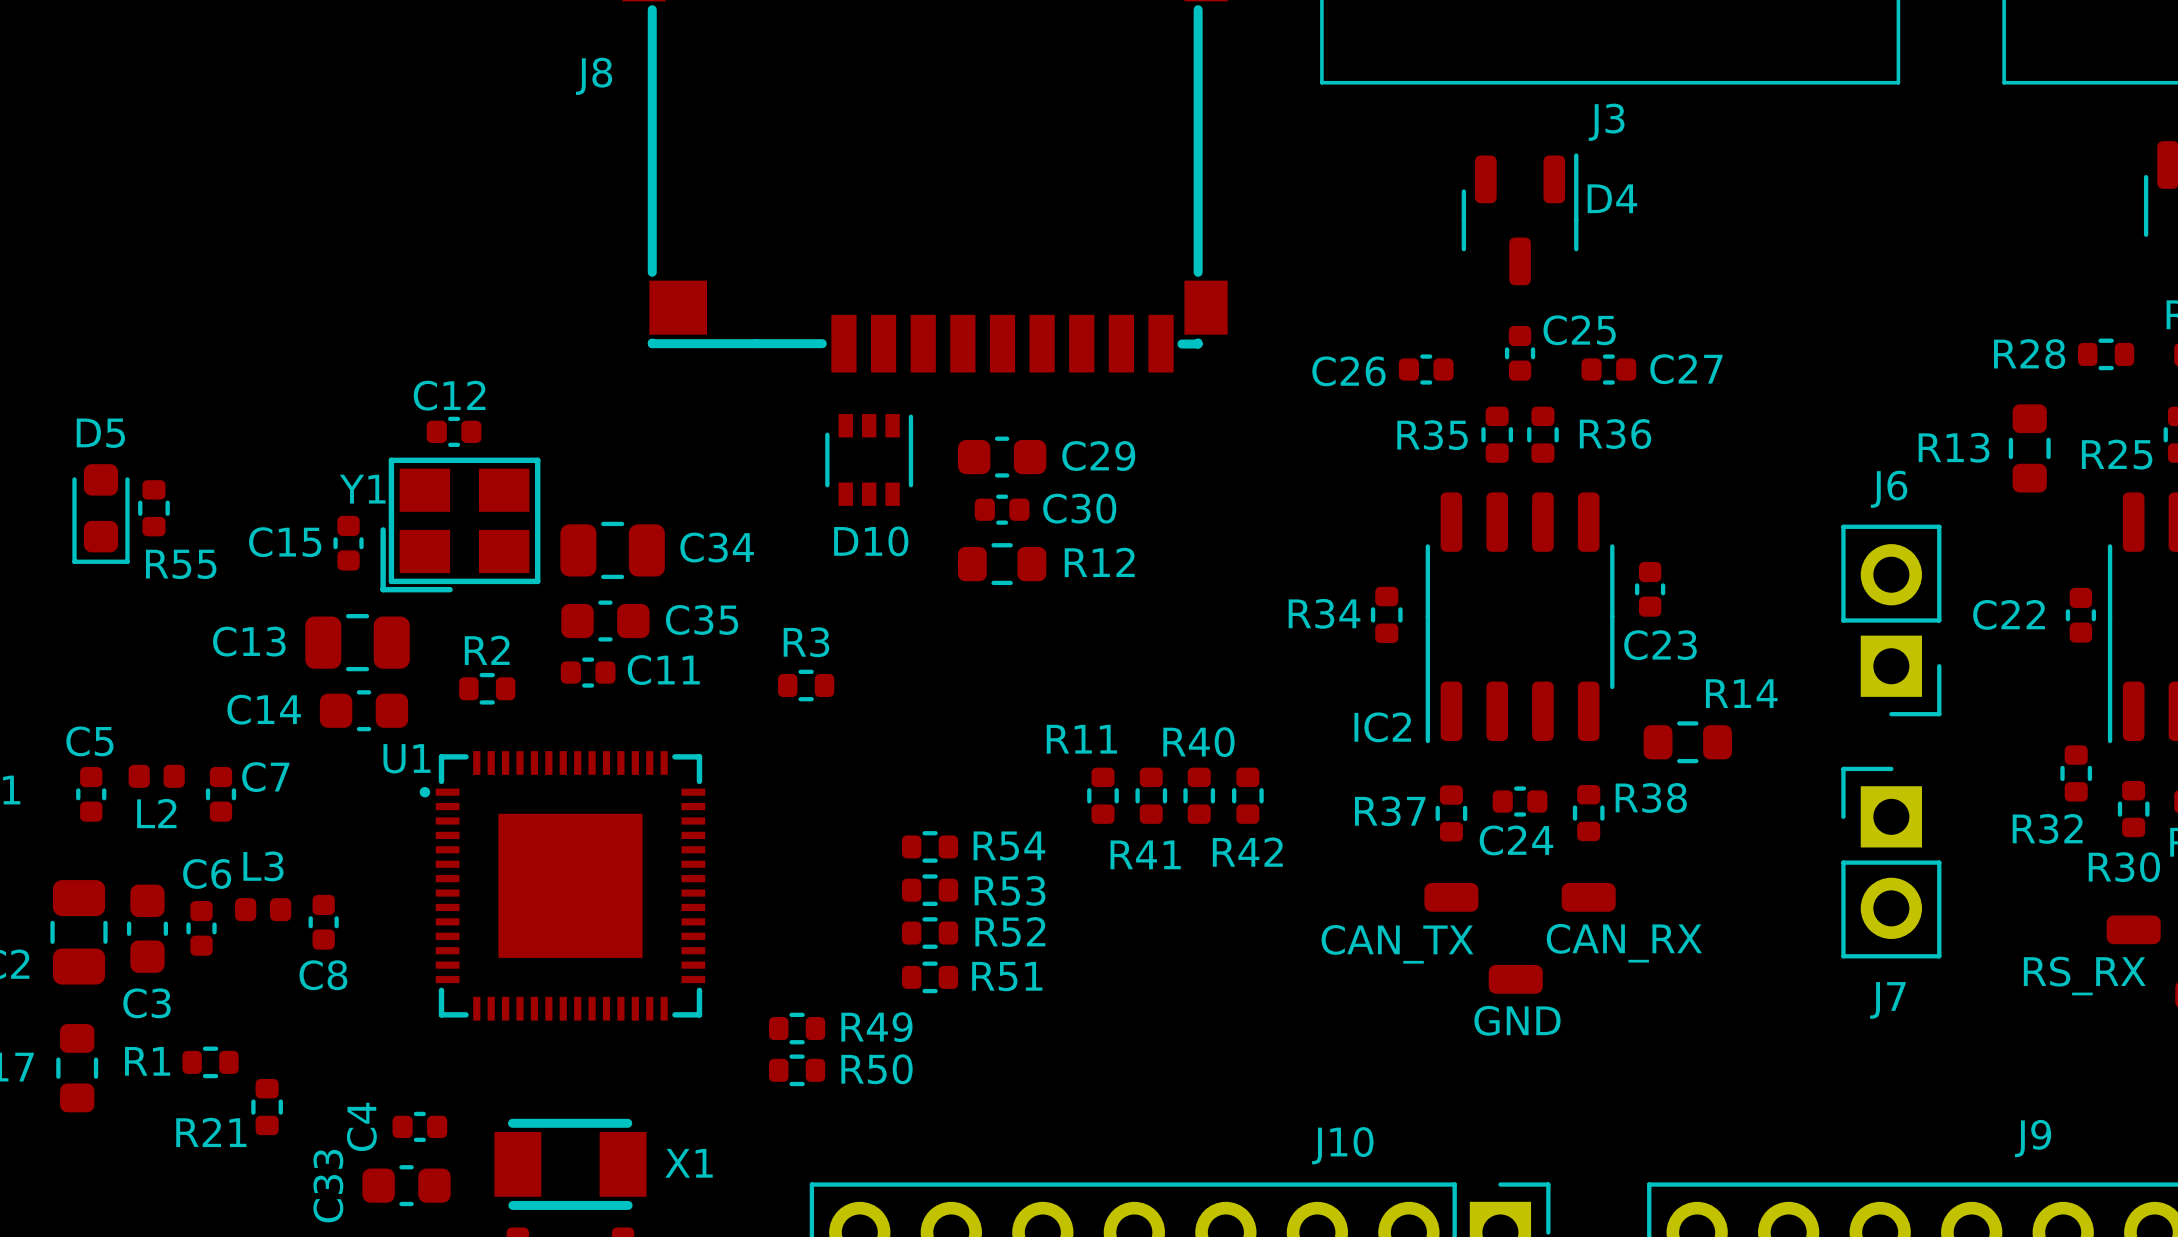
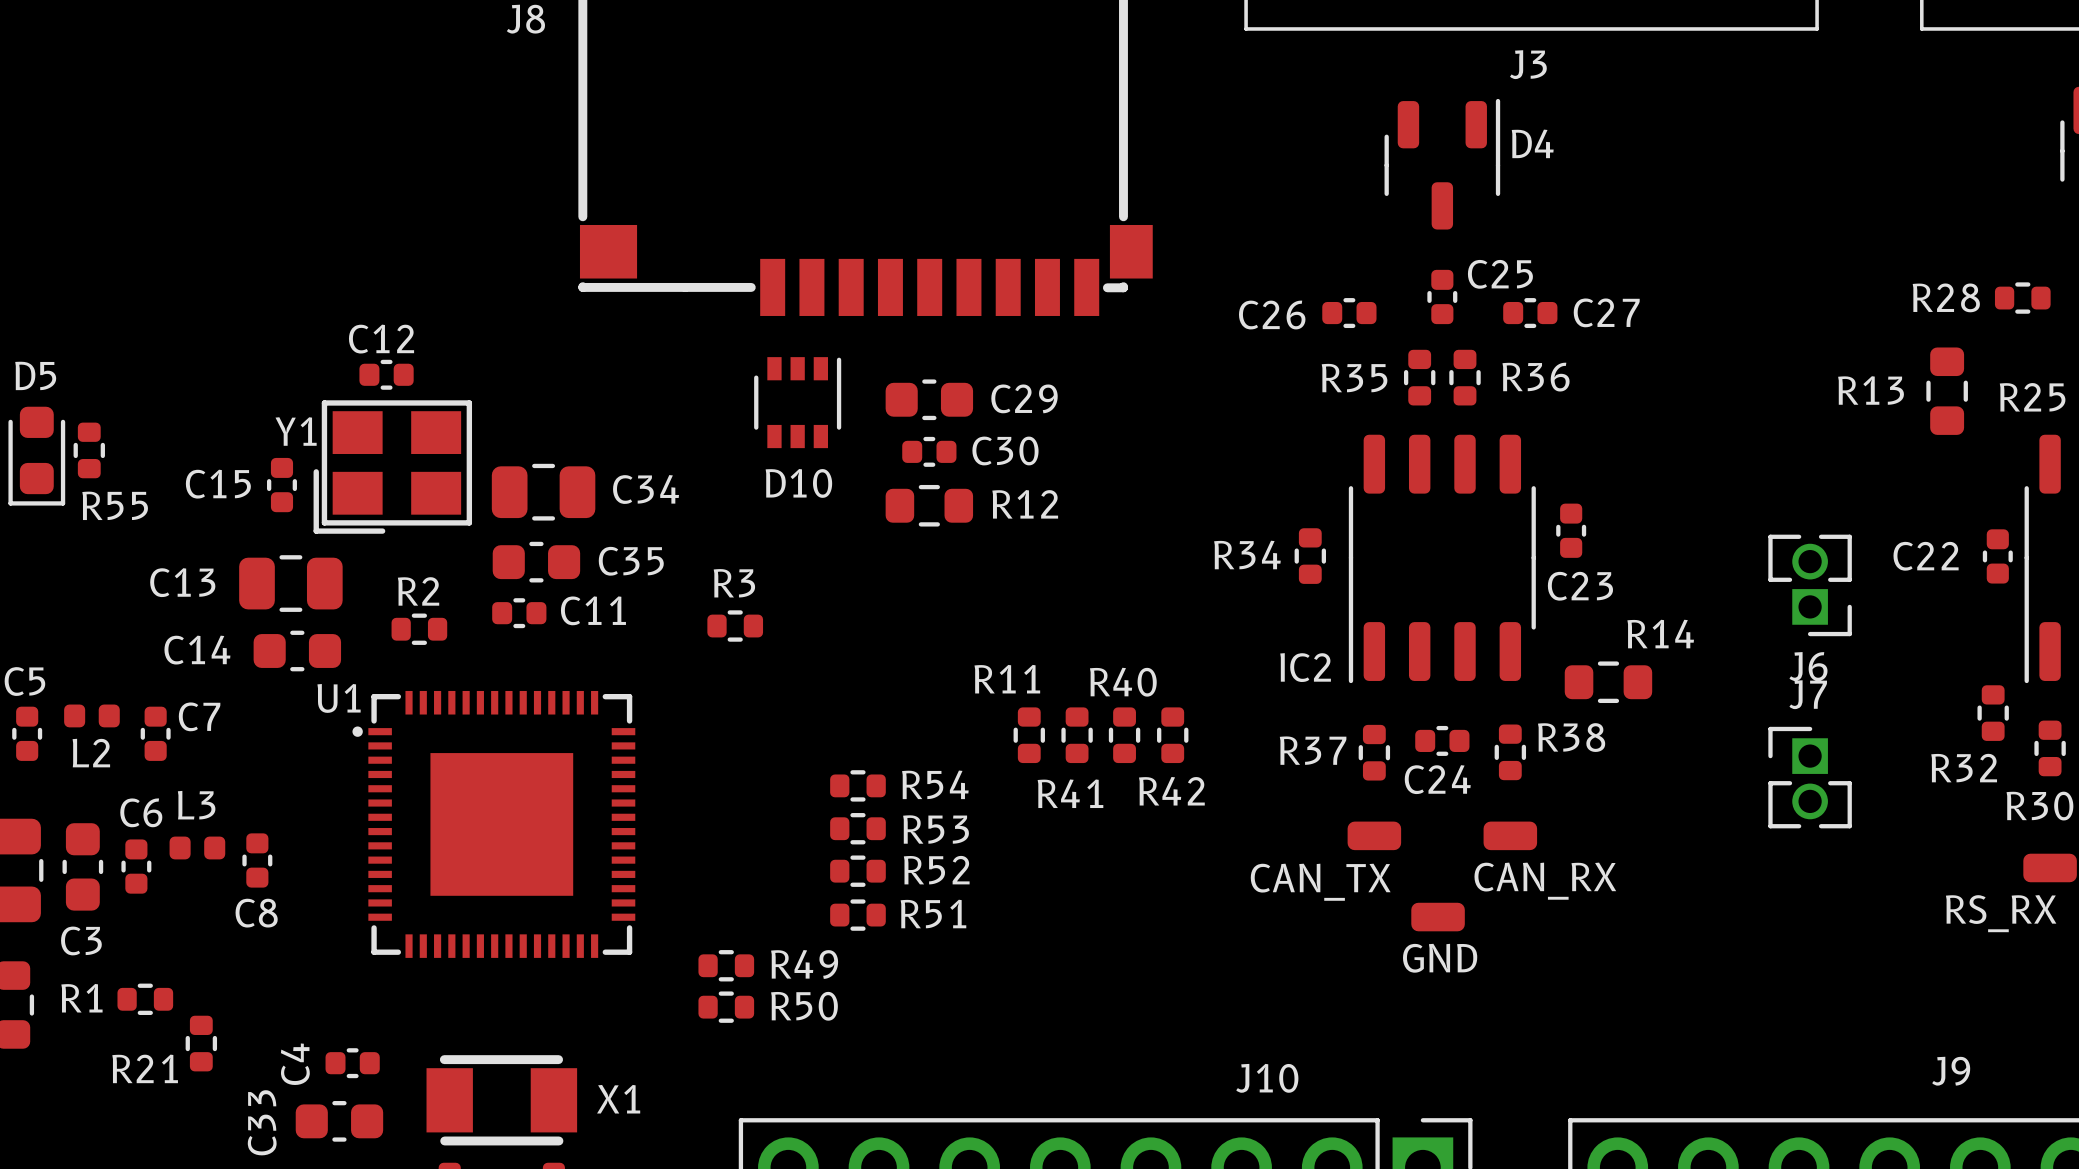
J6 name position: J6 (1889, 489) -> J6 (1808, 666)
J6 footprint: [1841, 524, 1942, 717] -> [1768, 534, 1852, 637]
J7 footprint: [1841, 766, 1942, 959] -> [1768, 726, 1852, 829]
J7 name position: J7 (1887, 1000) -> J7 (1808, 694)

